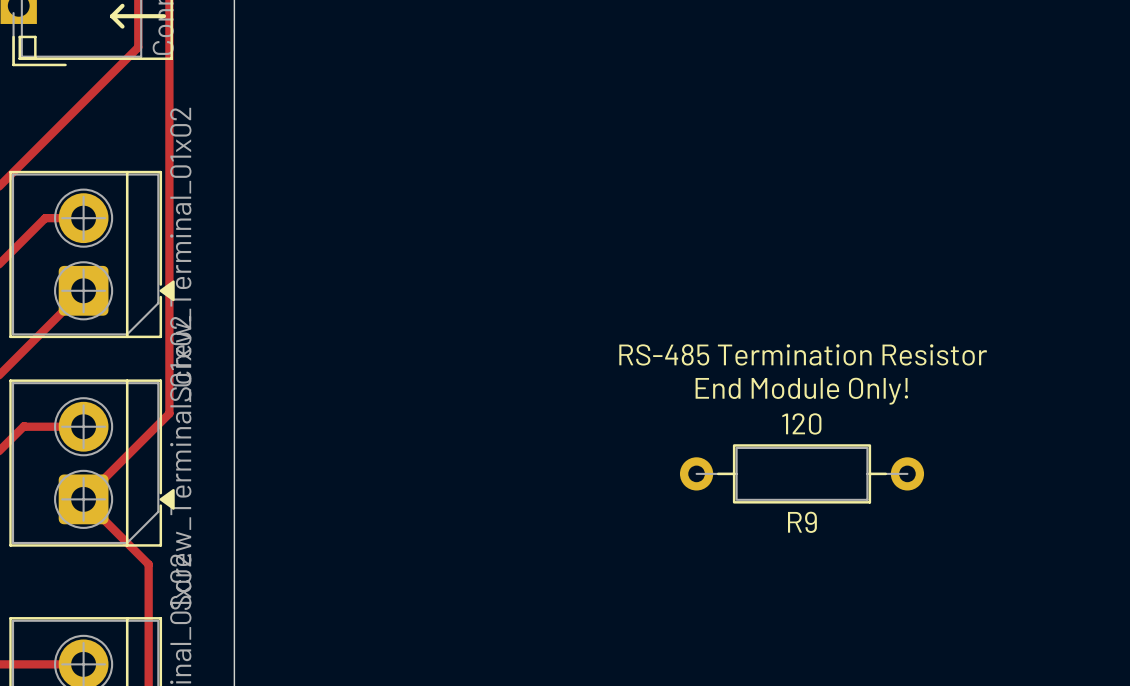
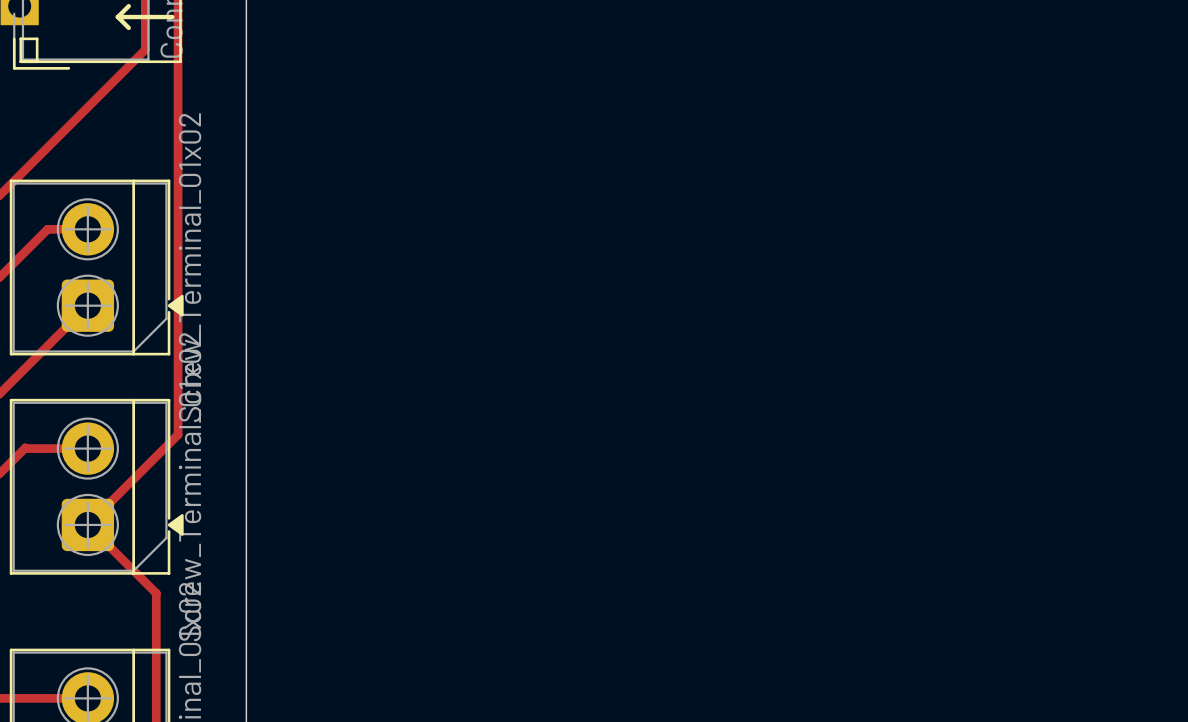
text: RS-485 Termination Resistor (803, 354) -> none
text: End Module Only! (801, 391) -> none
R9: 120 (802, 473) -> none

